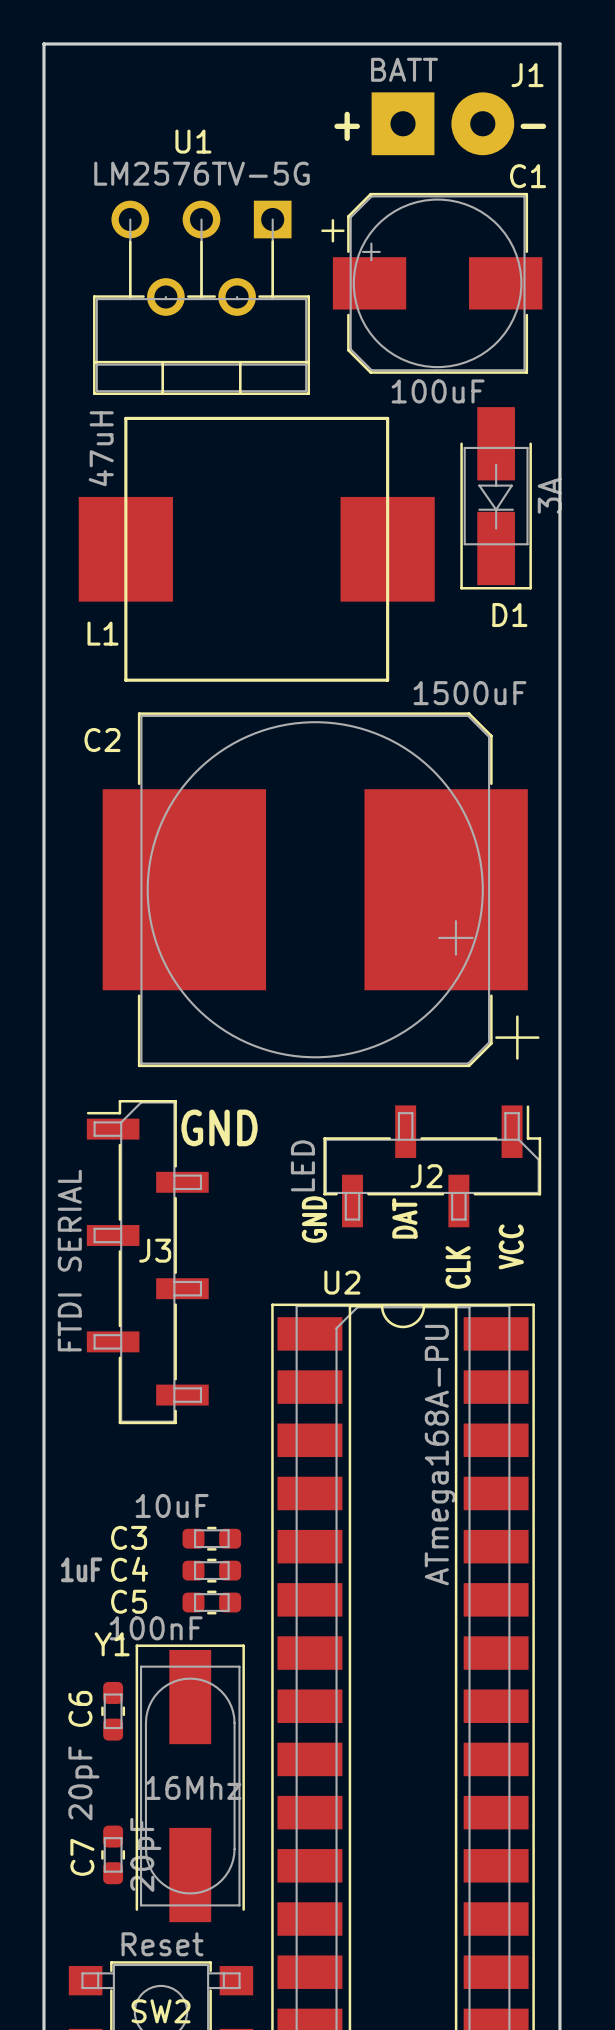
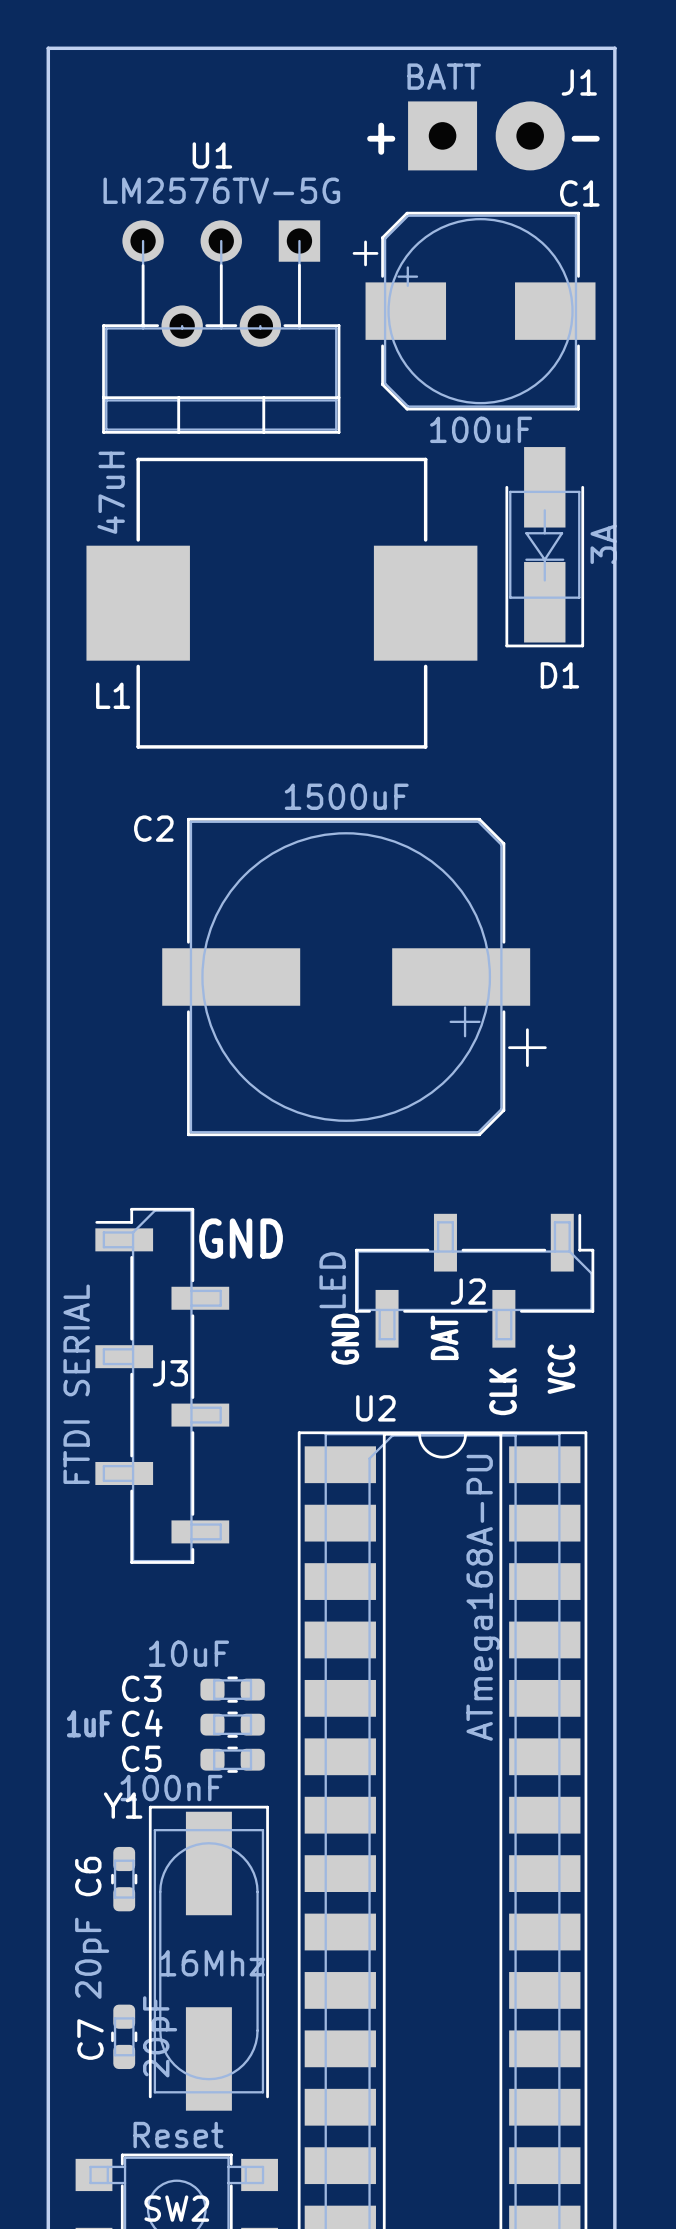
L1 footprint: [78, 416, 435, 682] -> [86, 457, 478, 749]
C2 value position: 1500uF (470, 693) -> 1500uF (346, 796)
C2 footprint: [102, 712, 540, 1068] -> [162, 817, 547, 1137]

